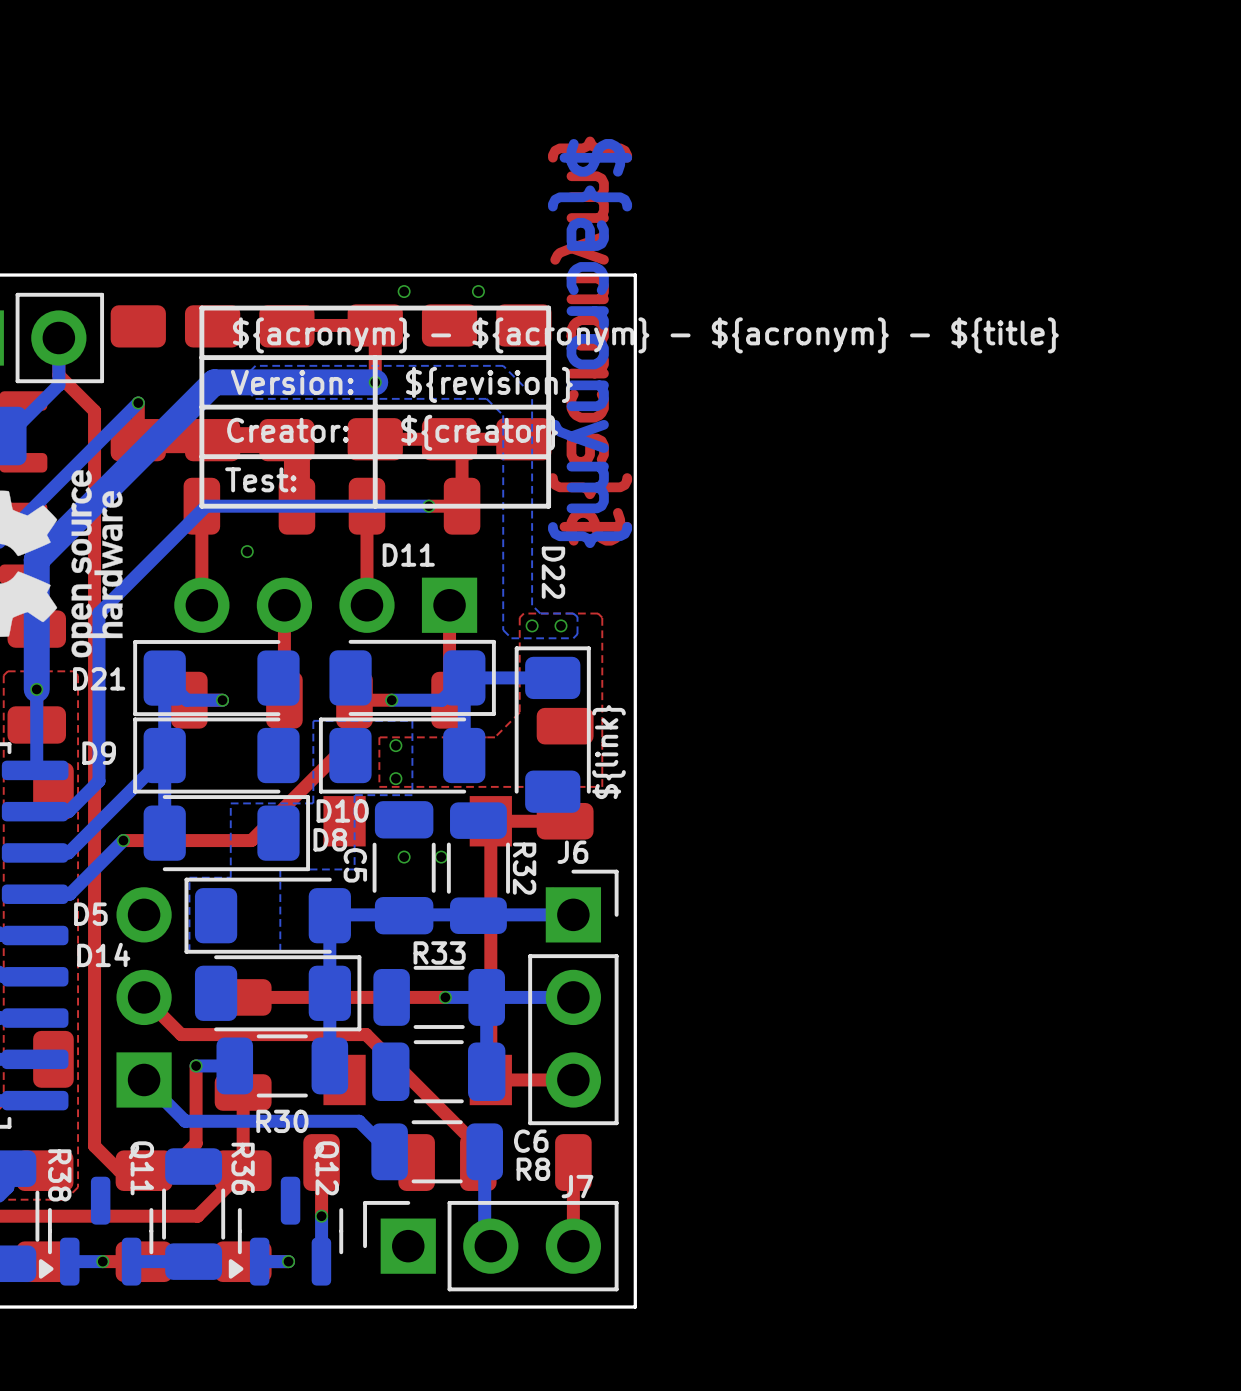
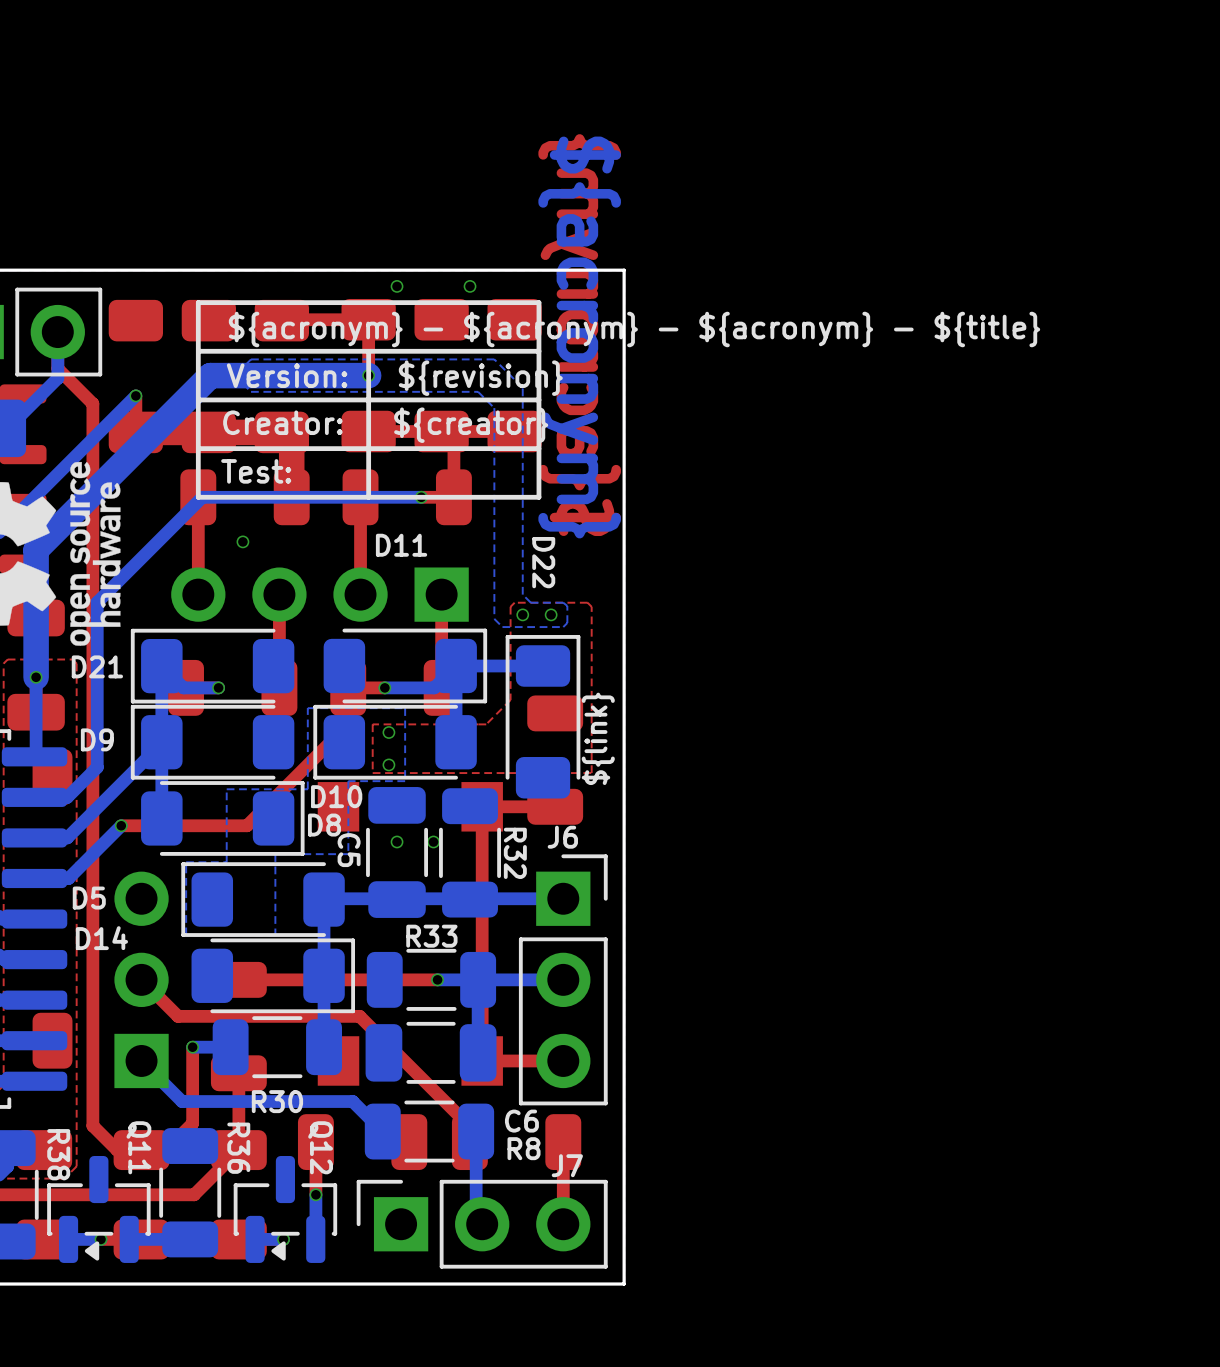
Q11 footprint: [38, 1176, 154, 1286] -> [47, 1155, 151, 1263]
Q12 footprint: [228, 1176, 344, 1286] -> [233, 1155, 338, 1263]

